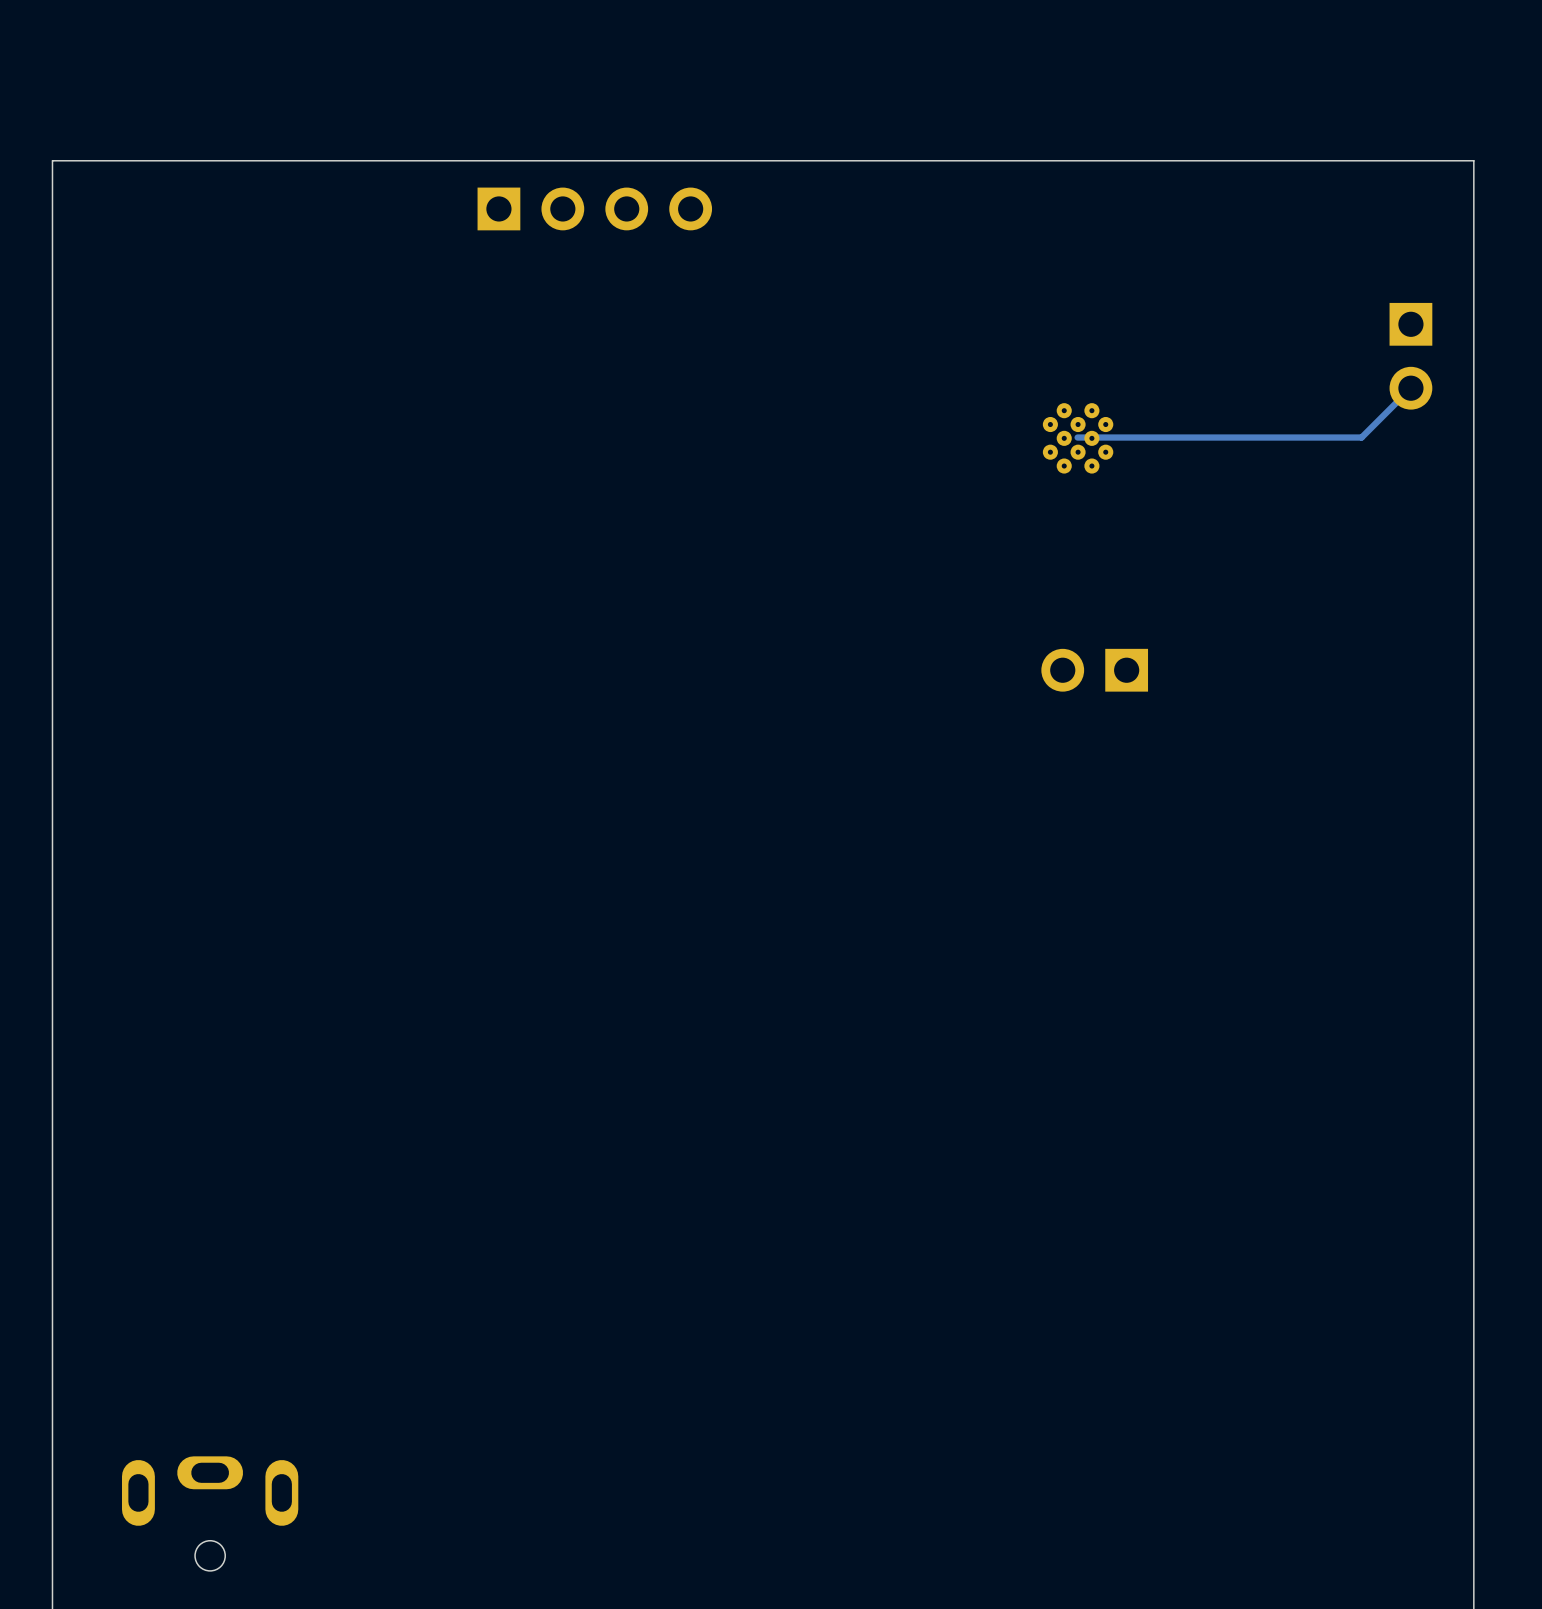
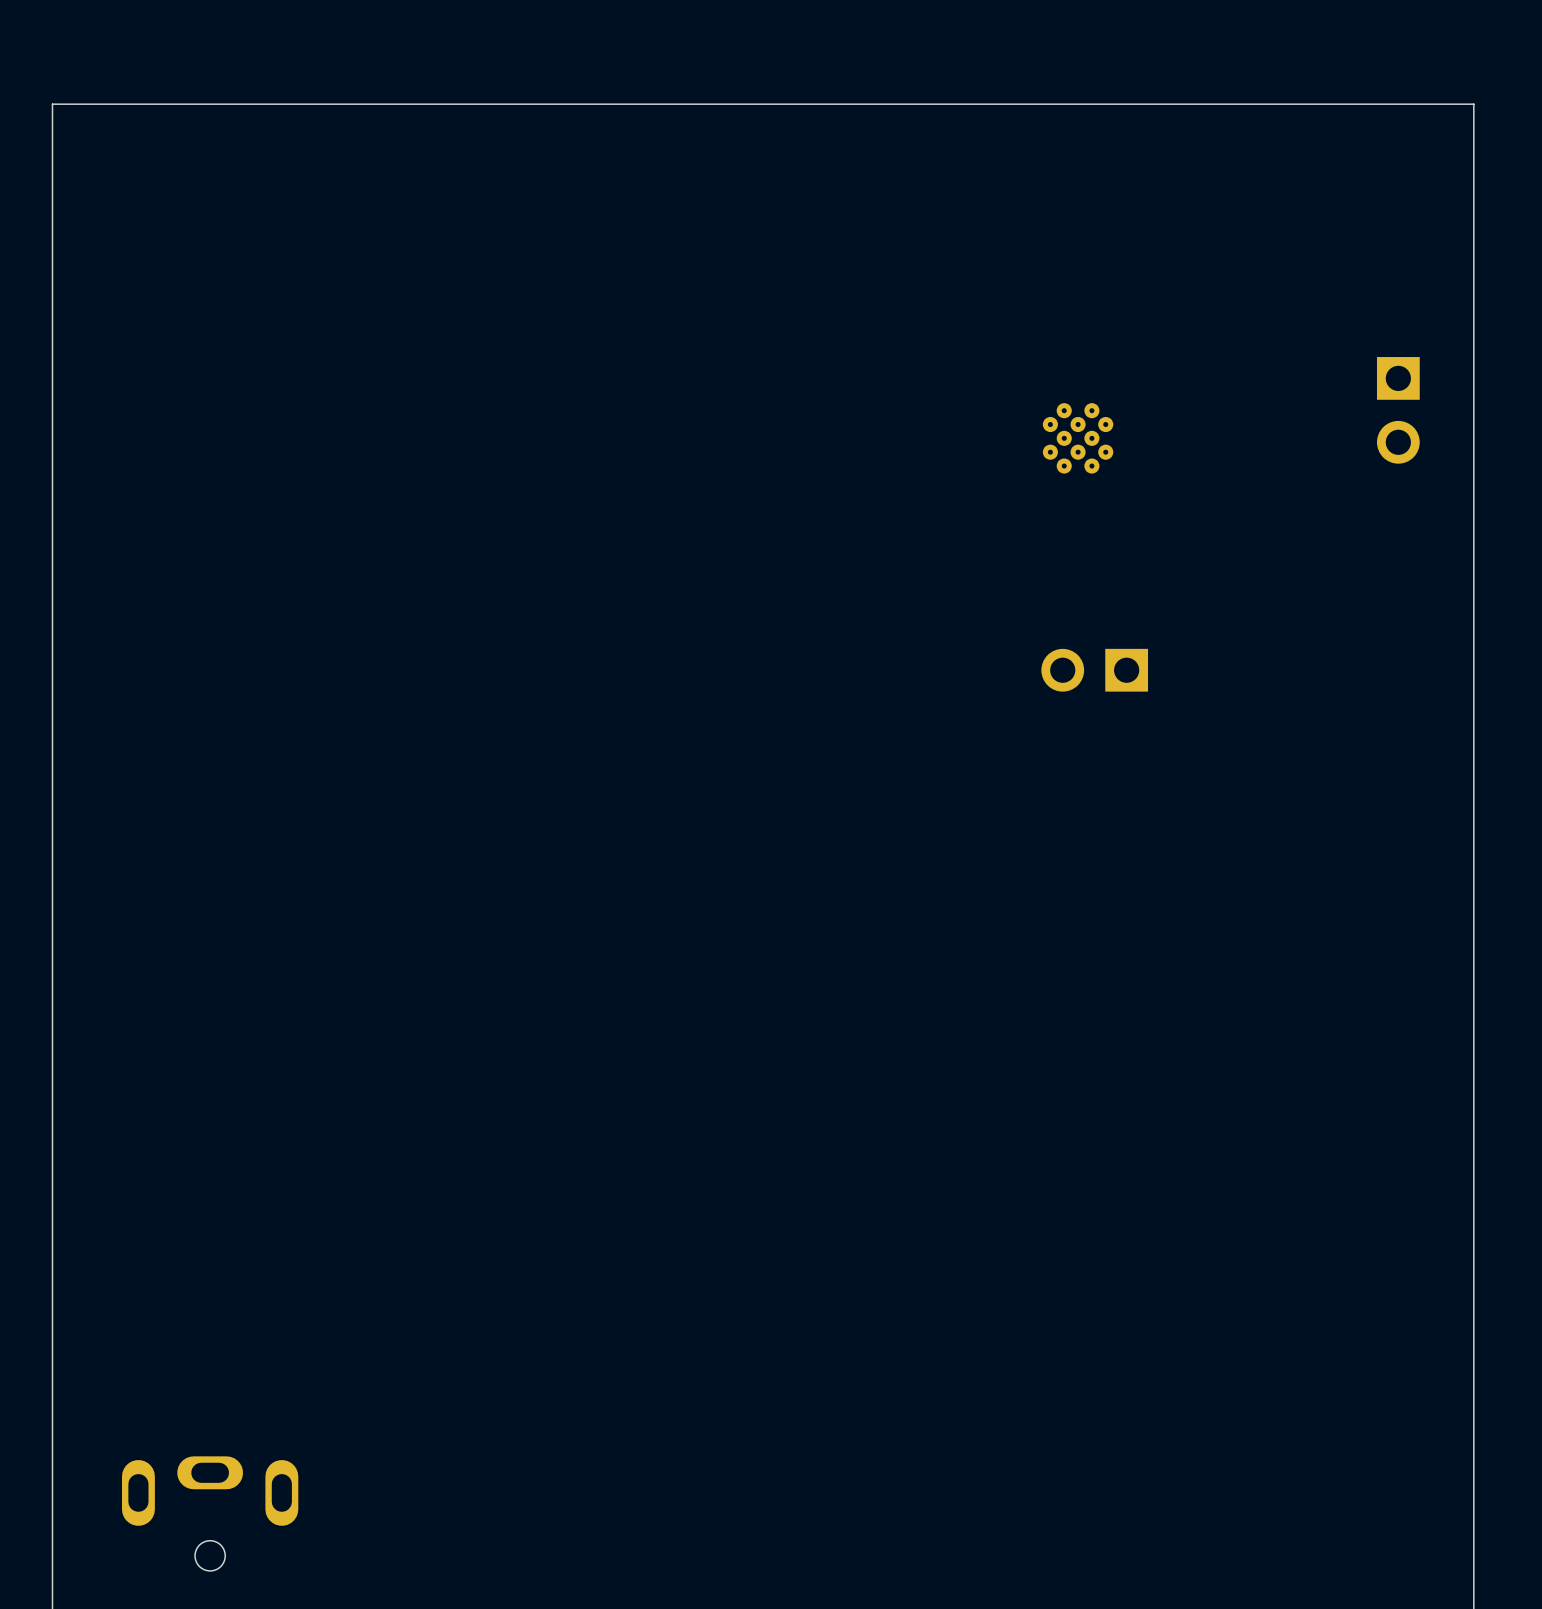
board edge: (1473, 160) (52, 160) -> (1473, 160) (1473, 104) (52, 104) (52, 160)
part: (594, 208) -> none
part position: (1410, 356) -> (1398, 410)
track: (1410, 388) (1361, 437) (1077, 437) -> none

